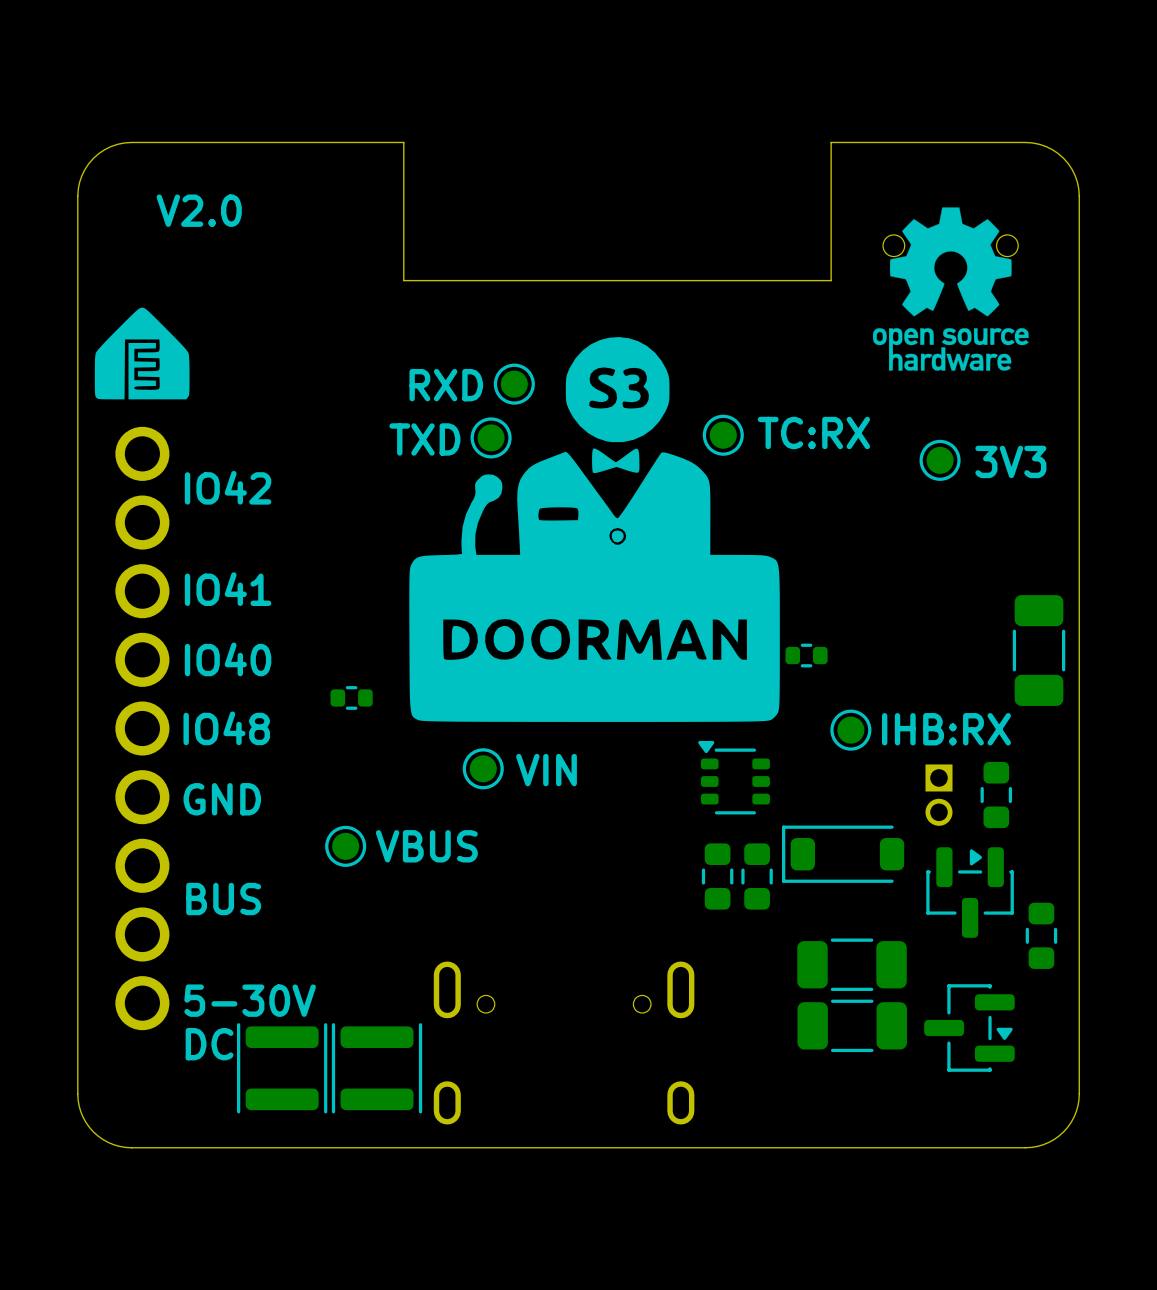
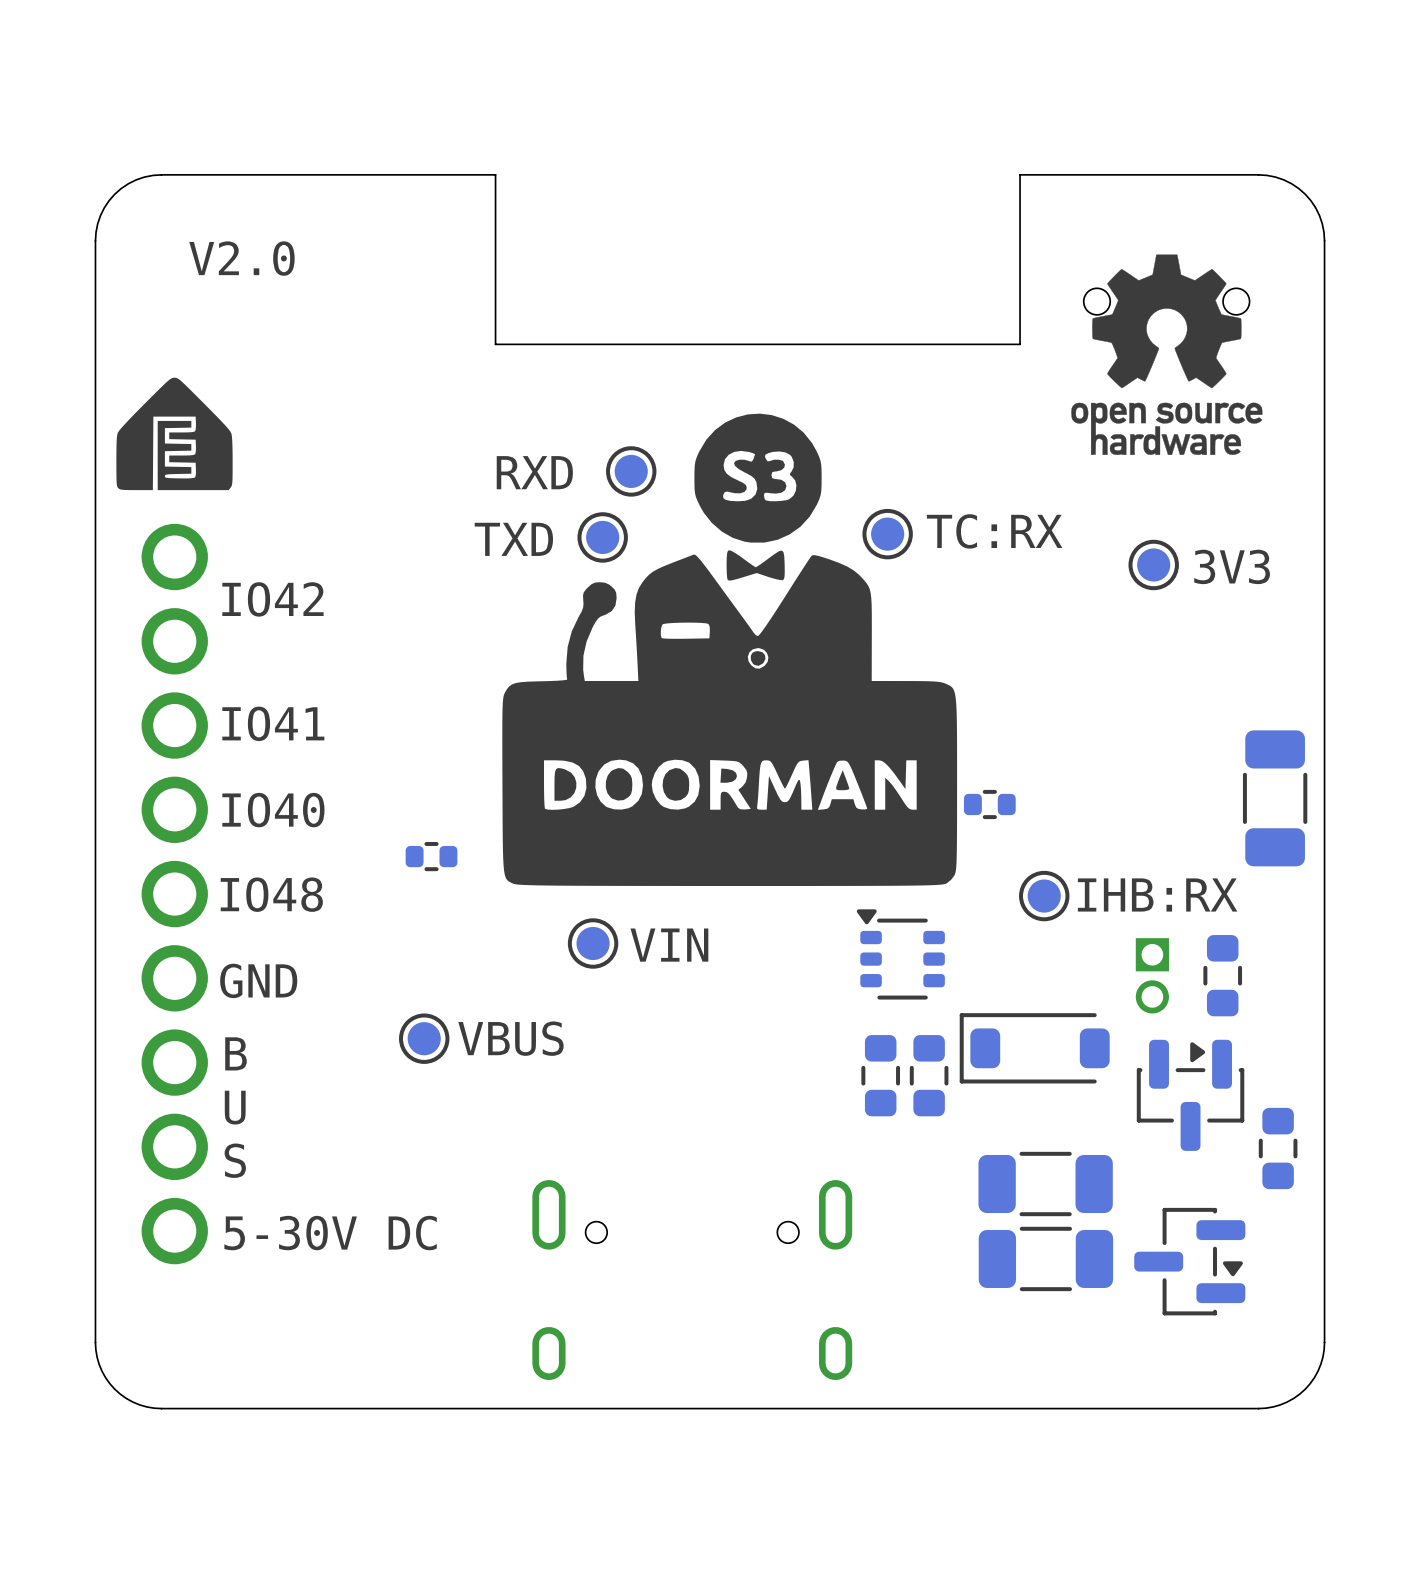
text: none -> B (236, 1053)
text: BUS (223, 899) -> U (235, 1107)
text: none -> S (235, 1160)
text: 5-30V (250, 1000) -> 5-30V DC (330, 1233)
text: DC (209, 1044) -> none
part: (282, 1068) -> none
part: (377, 1068) -> none

